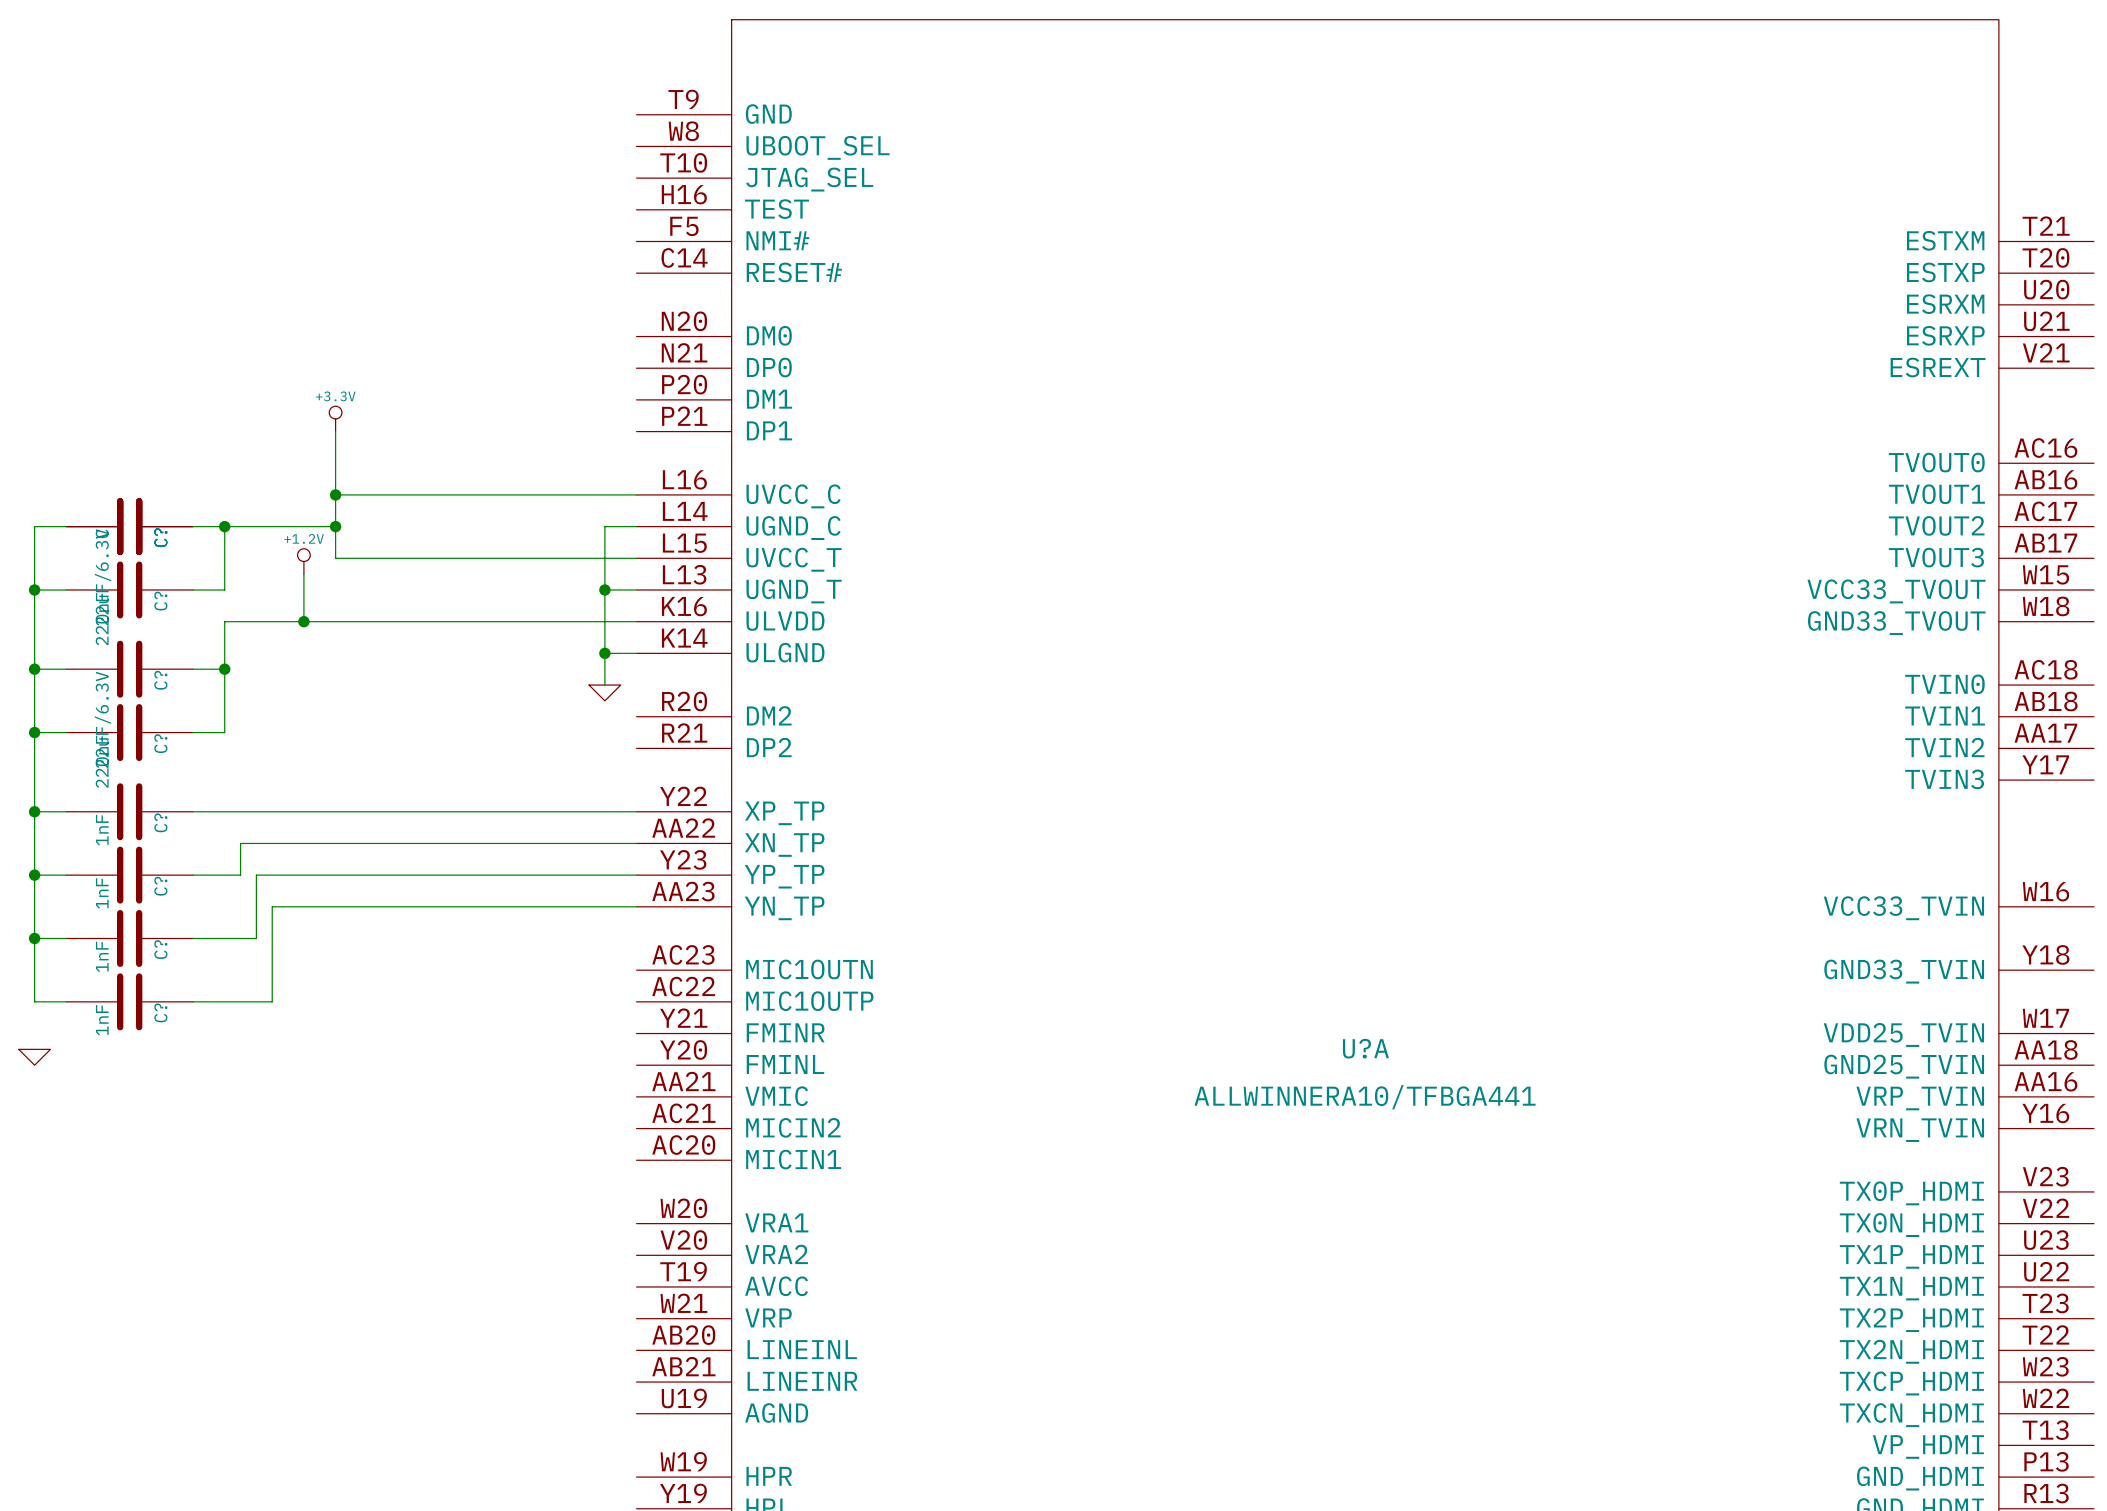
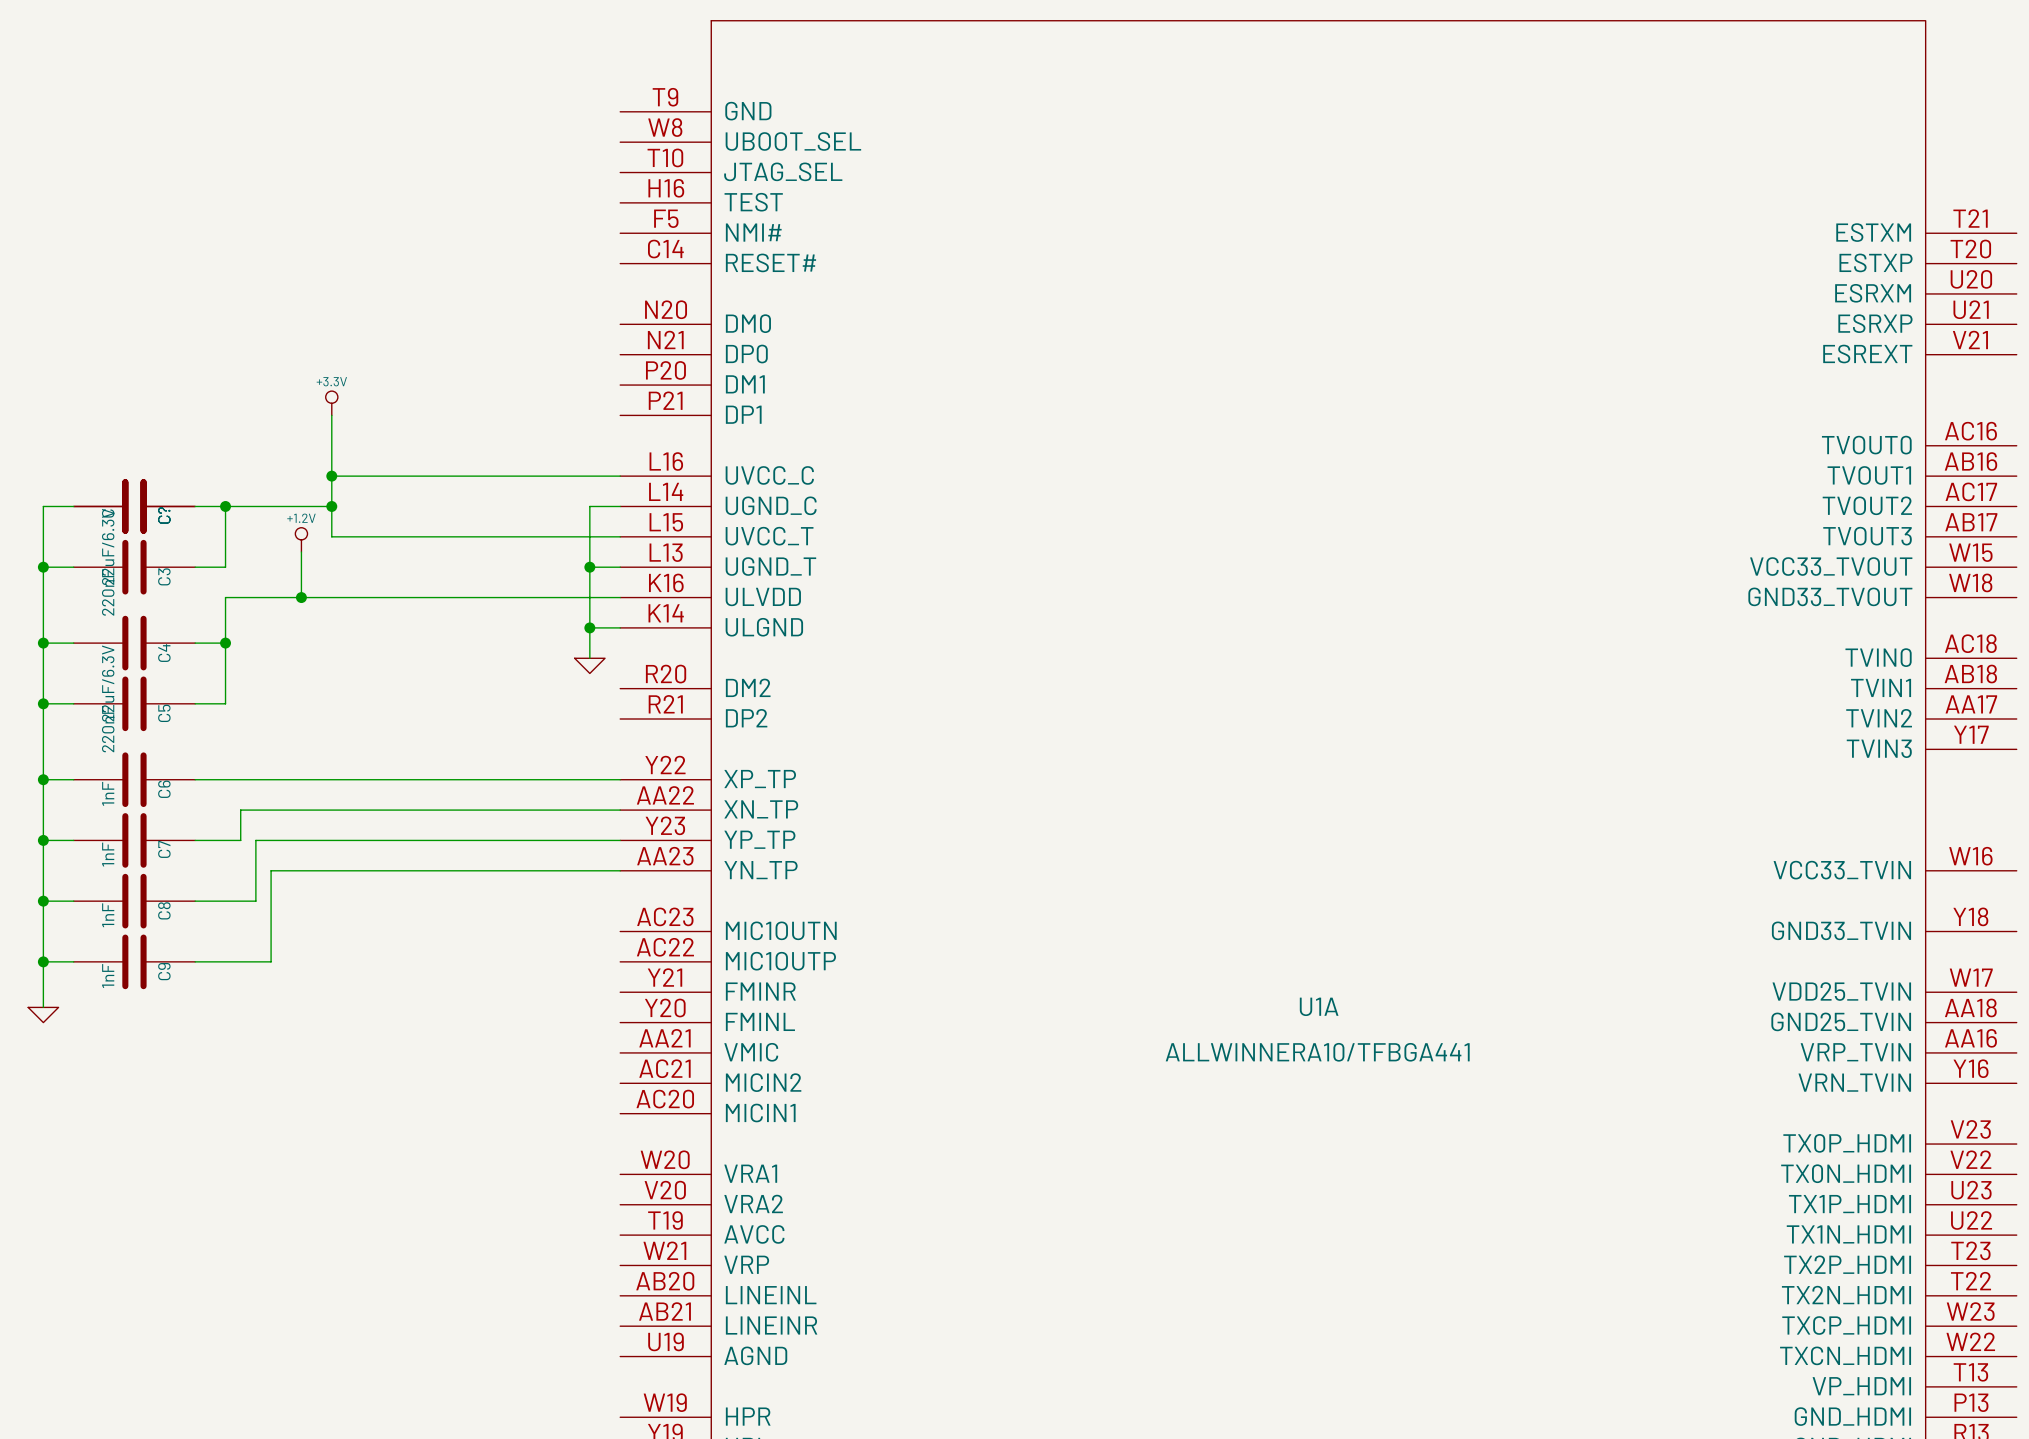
C? name: C? (160, 601) -> C3 (164, 576)
C? name: C? (160, 680) -> C4 (164, 653)
C? name: C? (160, 743) -> C5 (164, 713)
C? name: C? (160, 822) -> C6 (164, 789)
C? name: C? (160, 886) -> C7 (164, 849)
C? name: C? (160, 949) -> C8 (164, 910)
wire: none -> (43, 961) (43, 1007)
junction: none -> (43, 961)
C? name: C? (160, 1012) -> C9 (164, 971)
U?A name: U?A (1365, 1048) -> U1A (1319, 1006)

